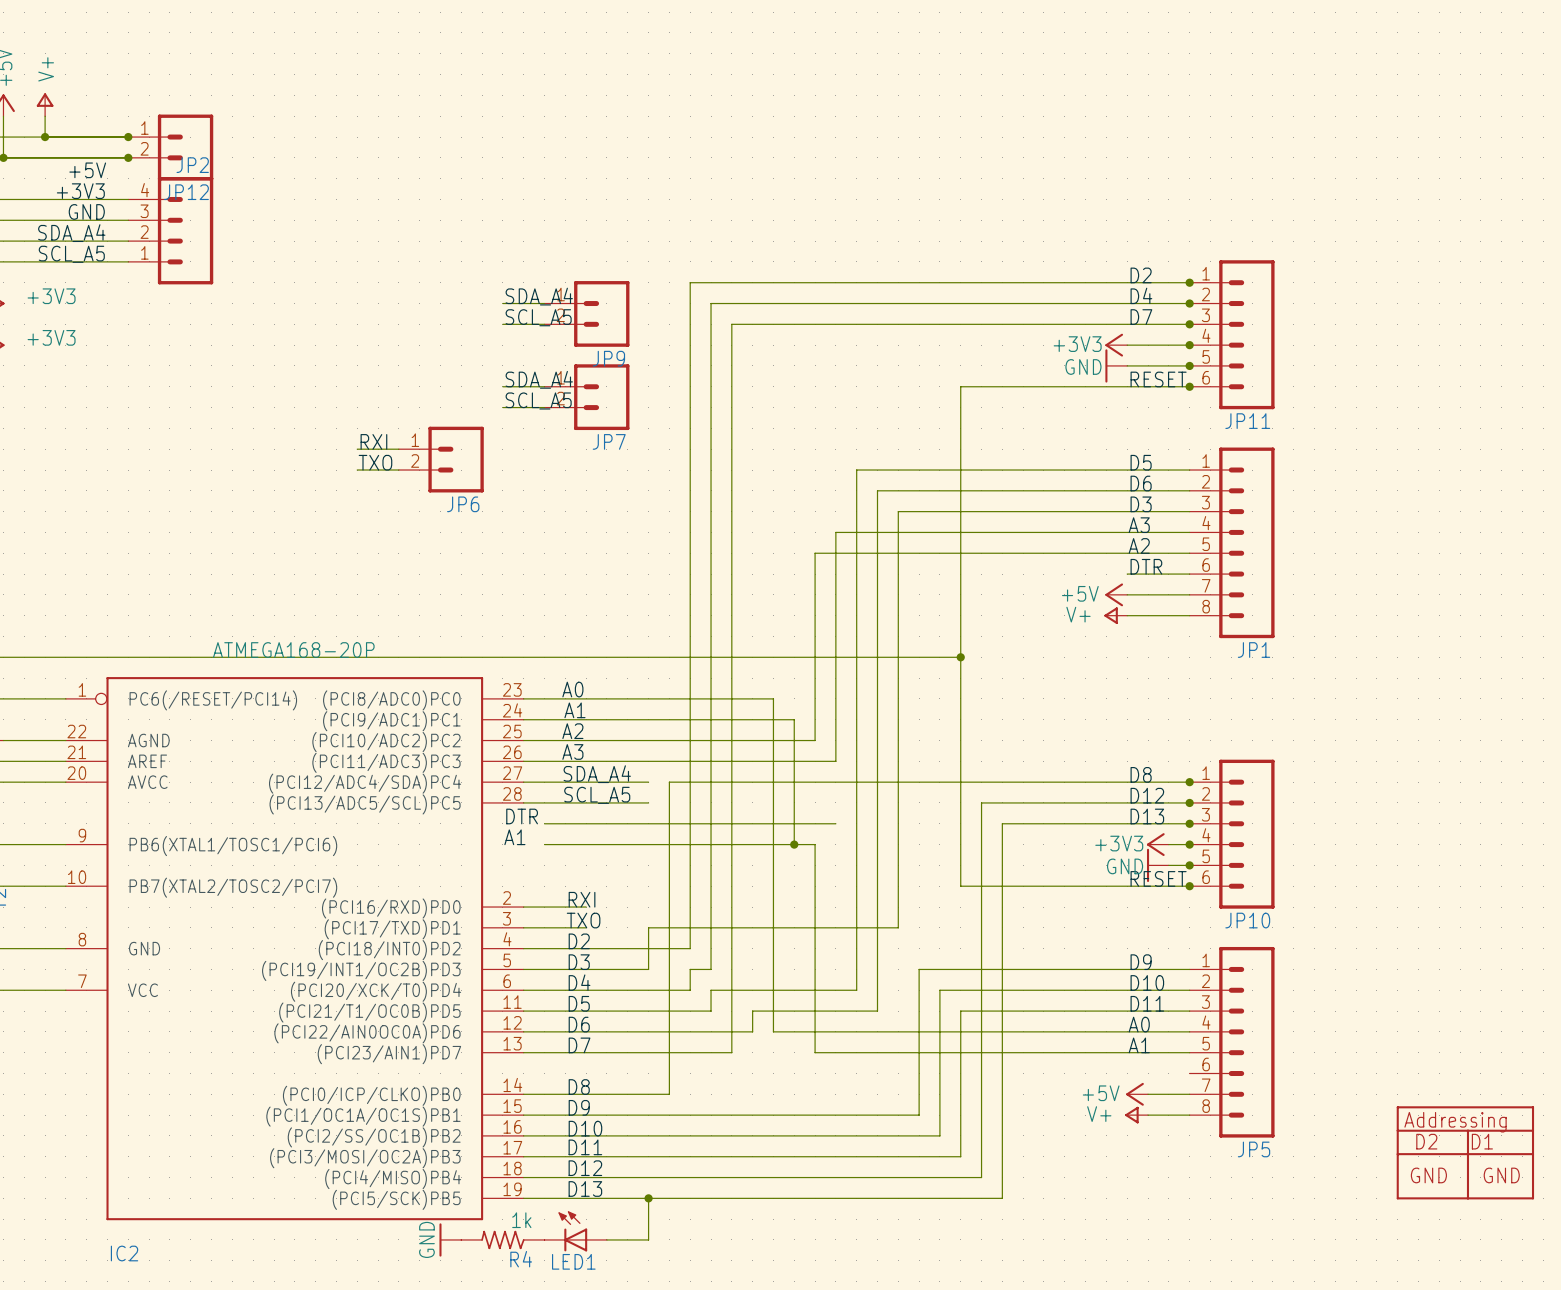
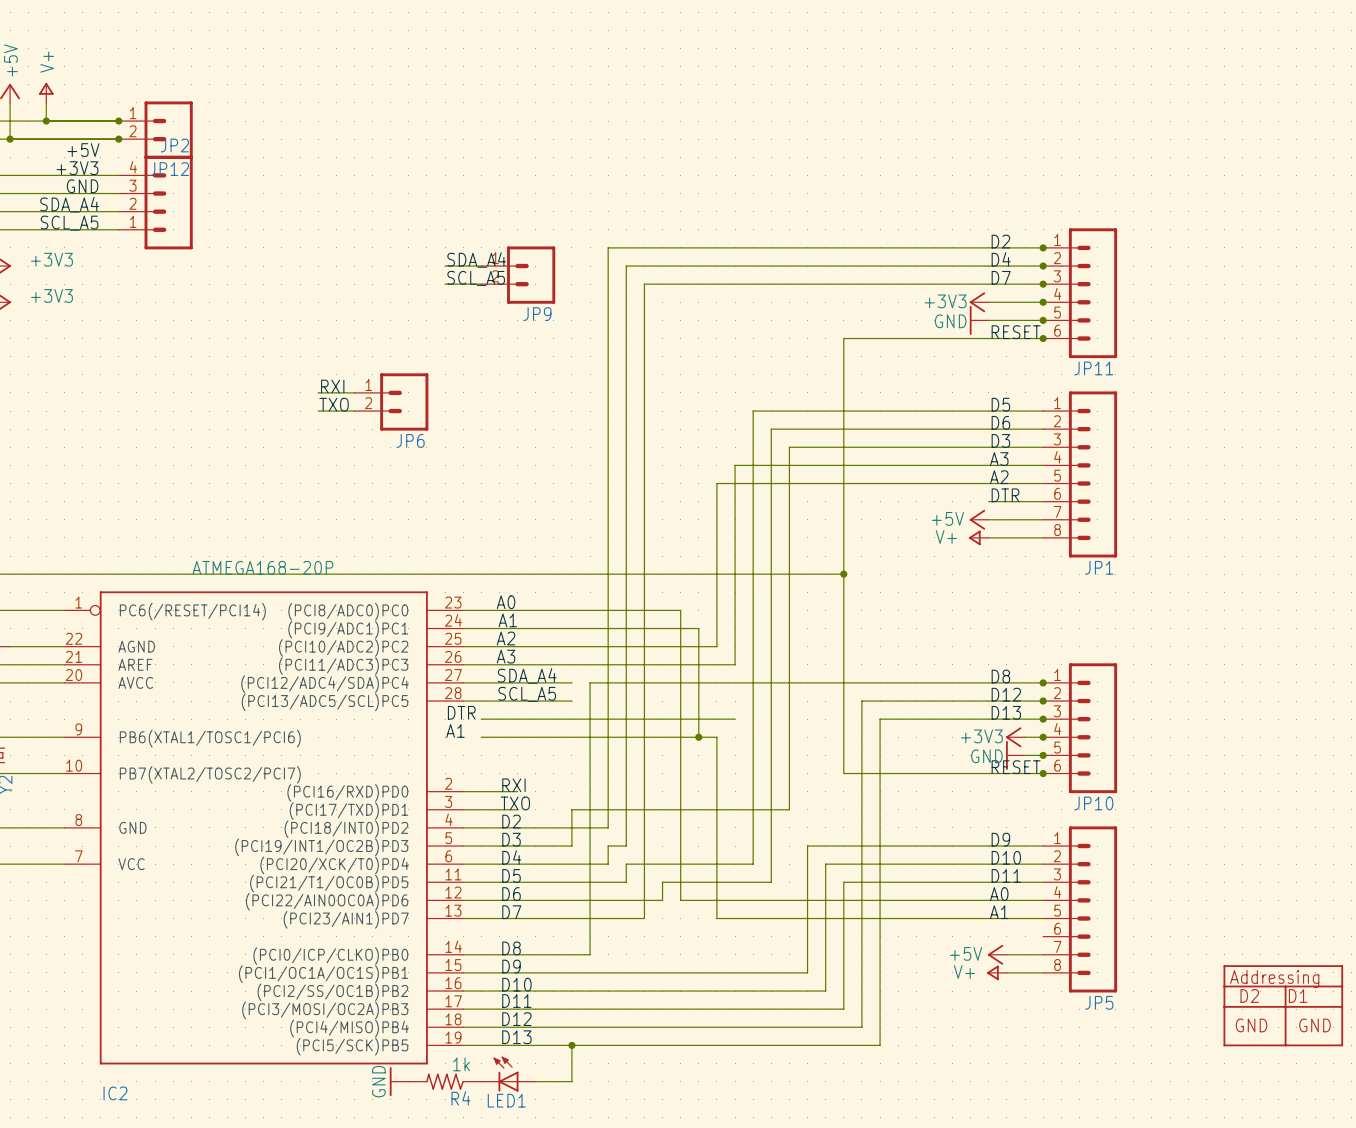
label: SDA_A4 (539, 379) -> none
wire: (502, 386) (544, 386) -> none
JP7: (586, 397) -> none
label: SCL_A5 (538, 400) -> none
wire: (502, 407) (544, 407) -> none

